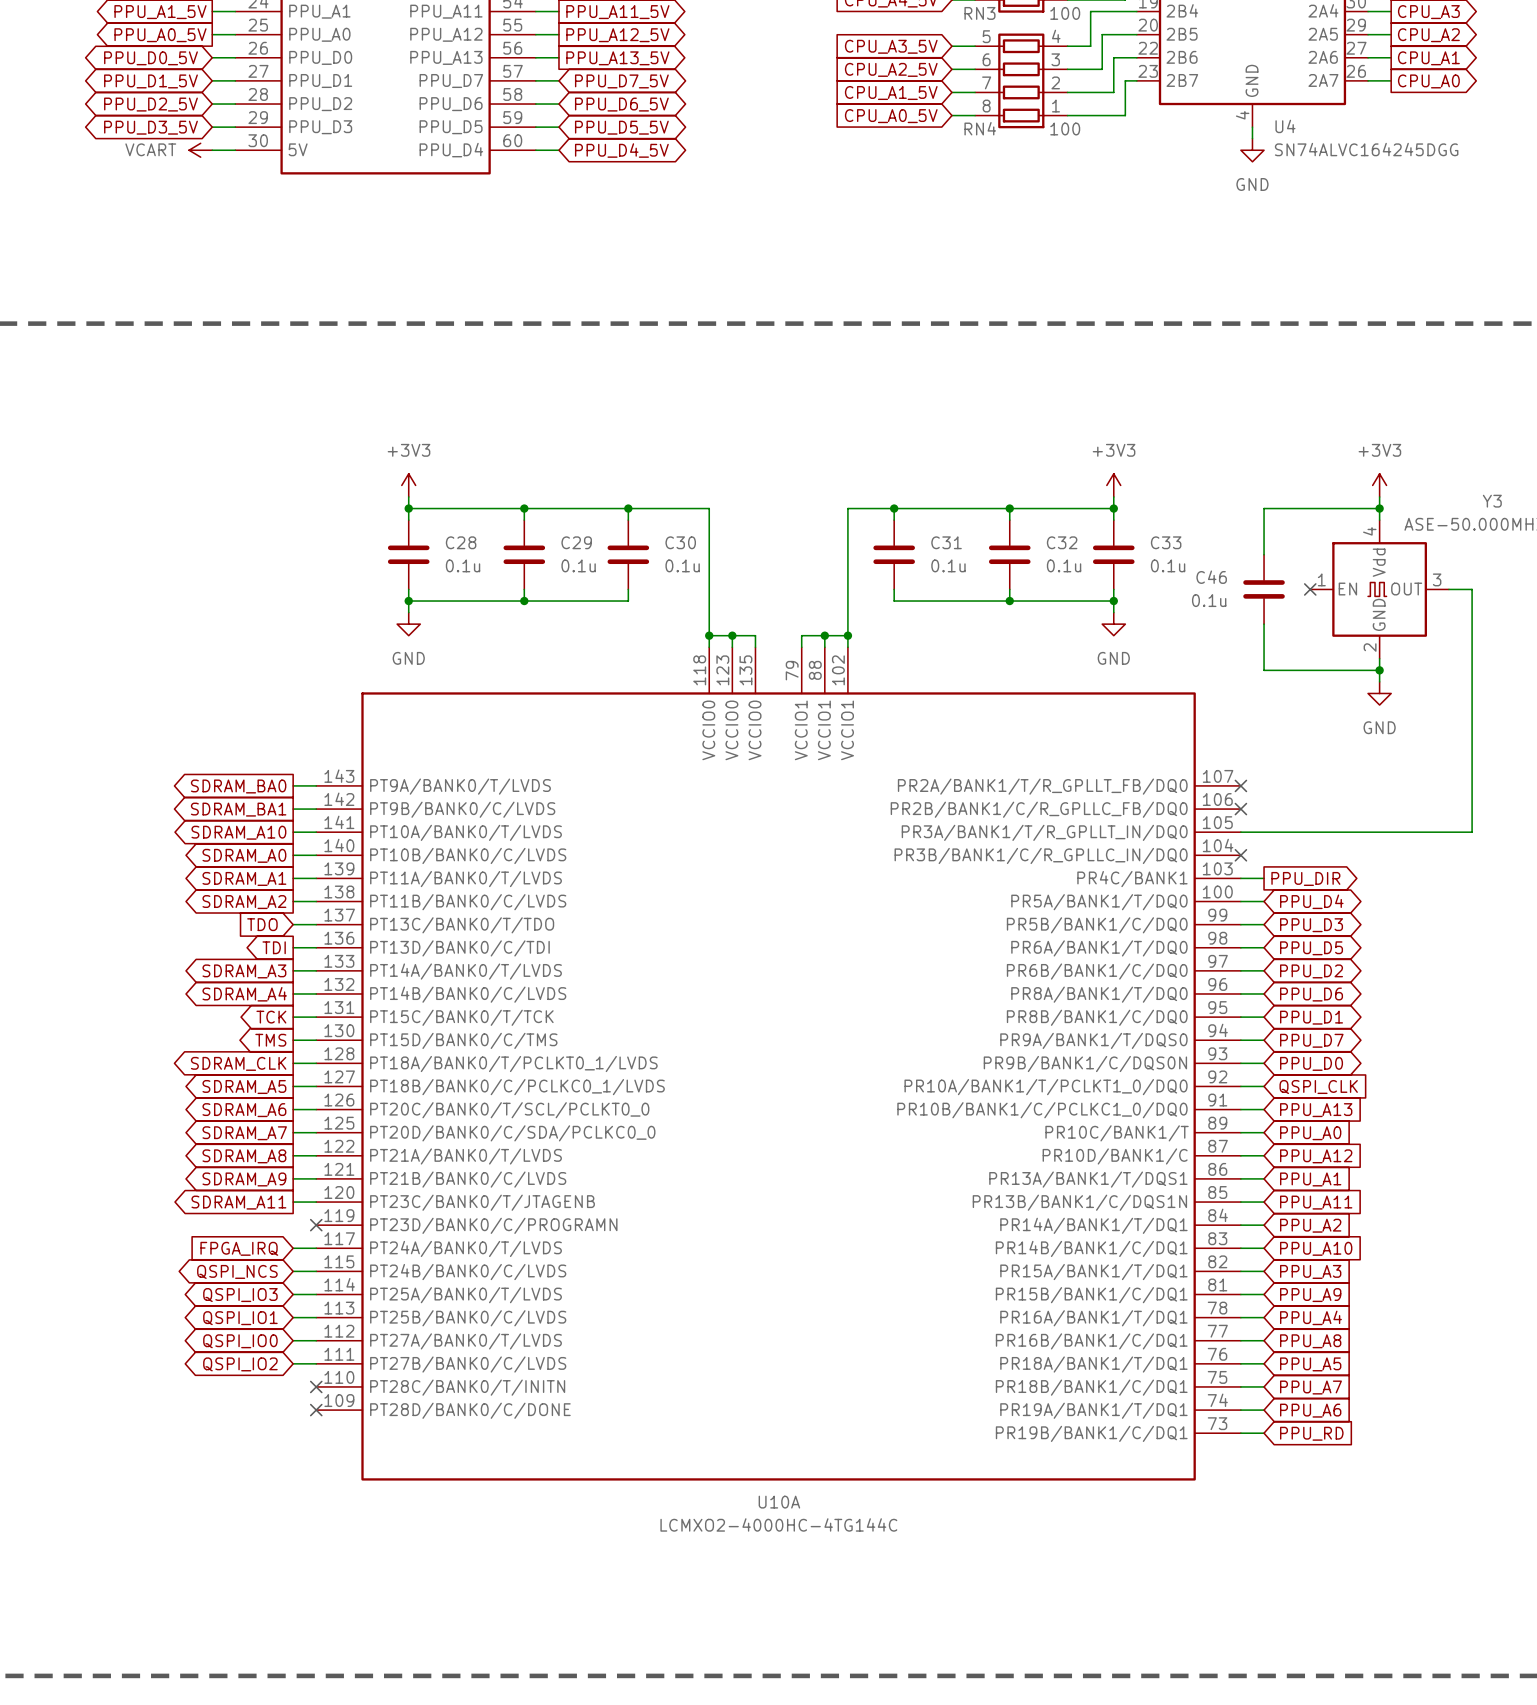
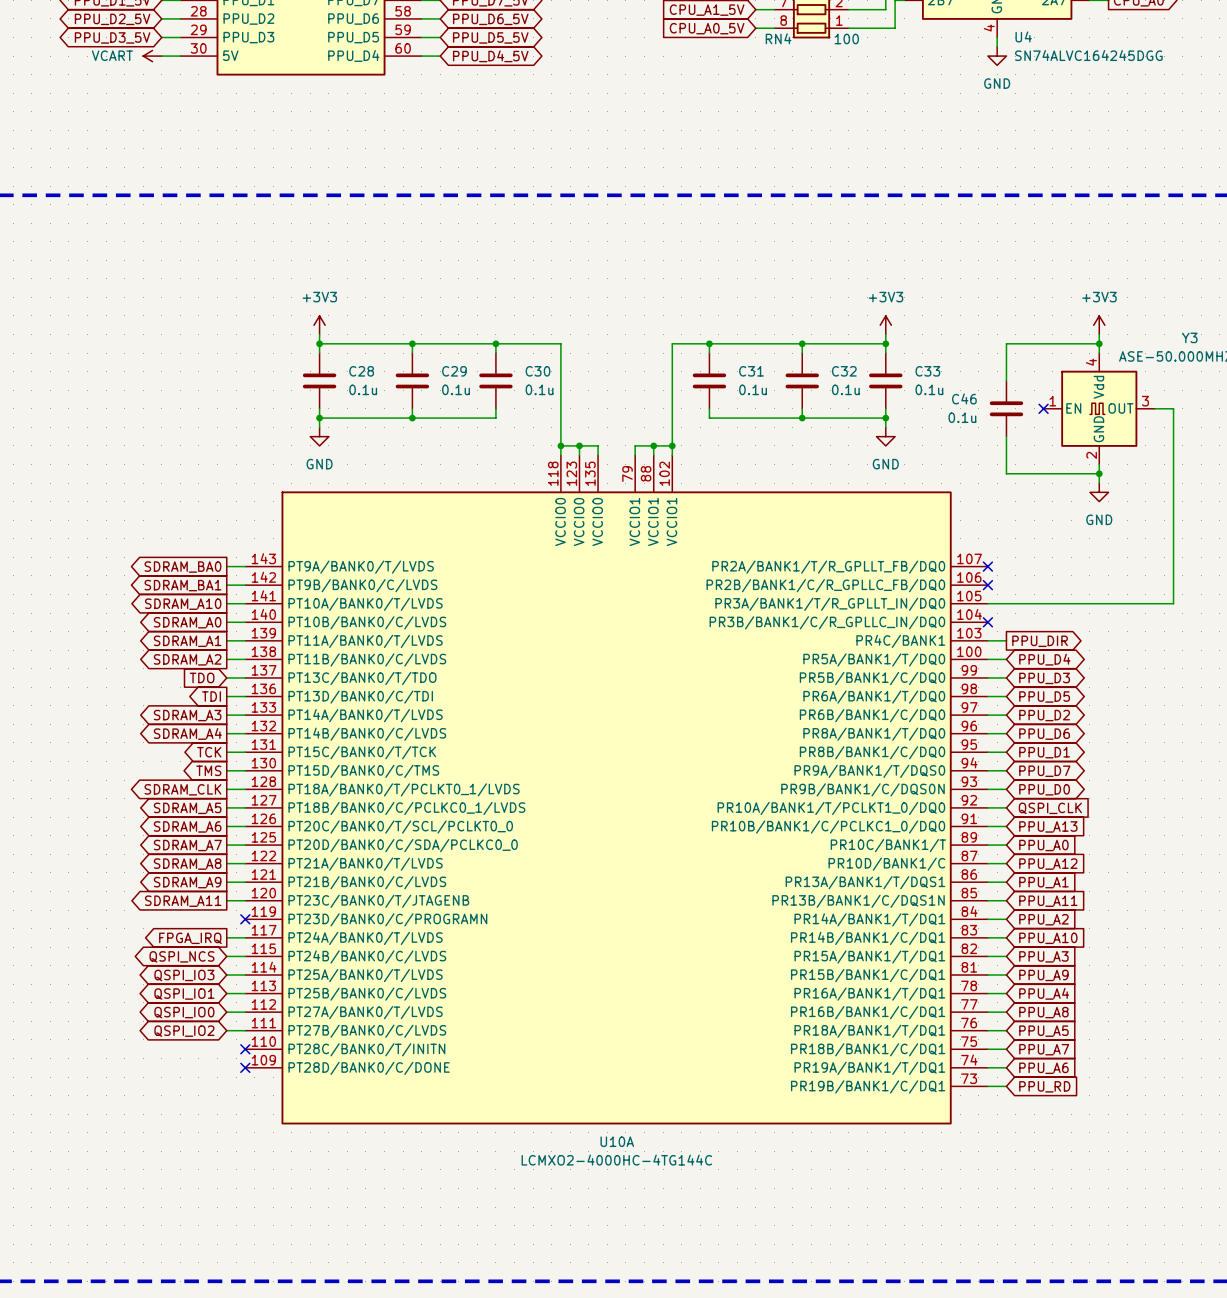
global label shape: input (239, 1248) -> output (190, 938)

